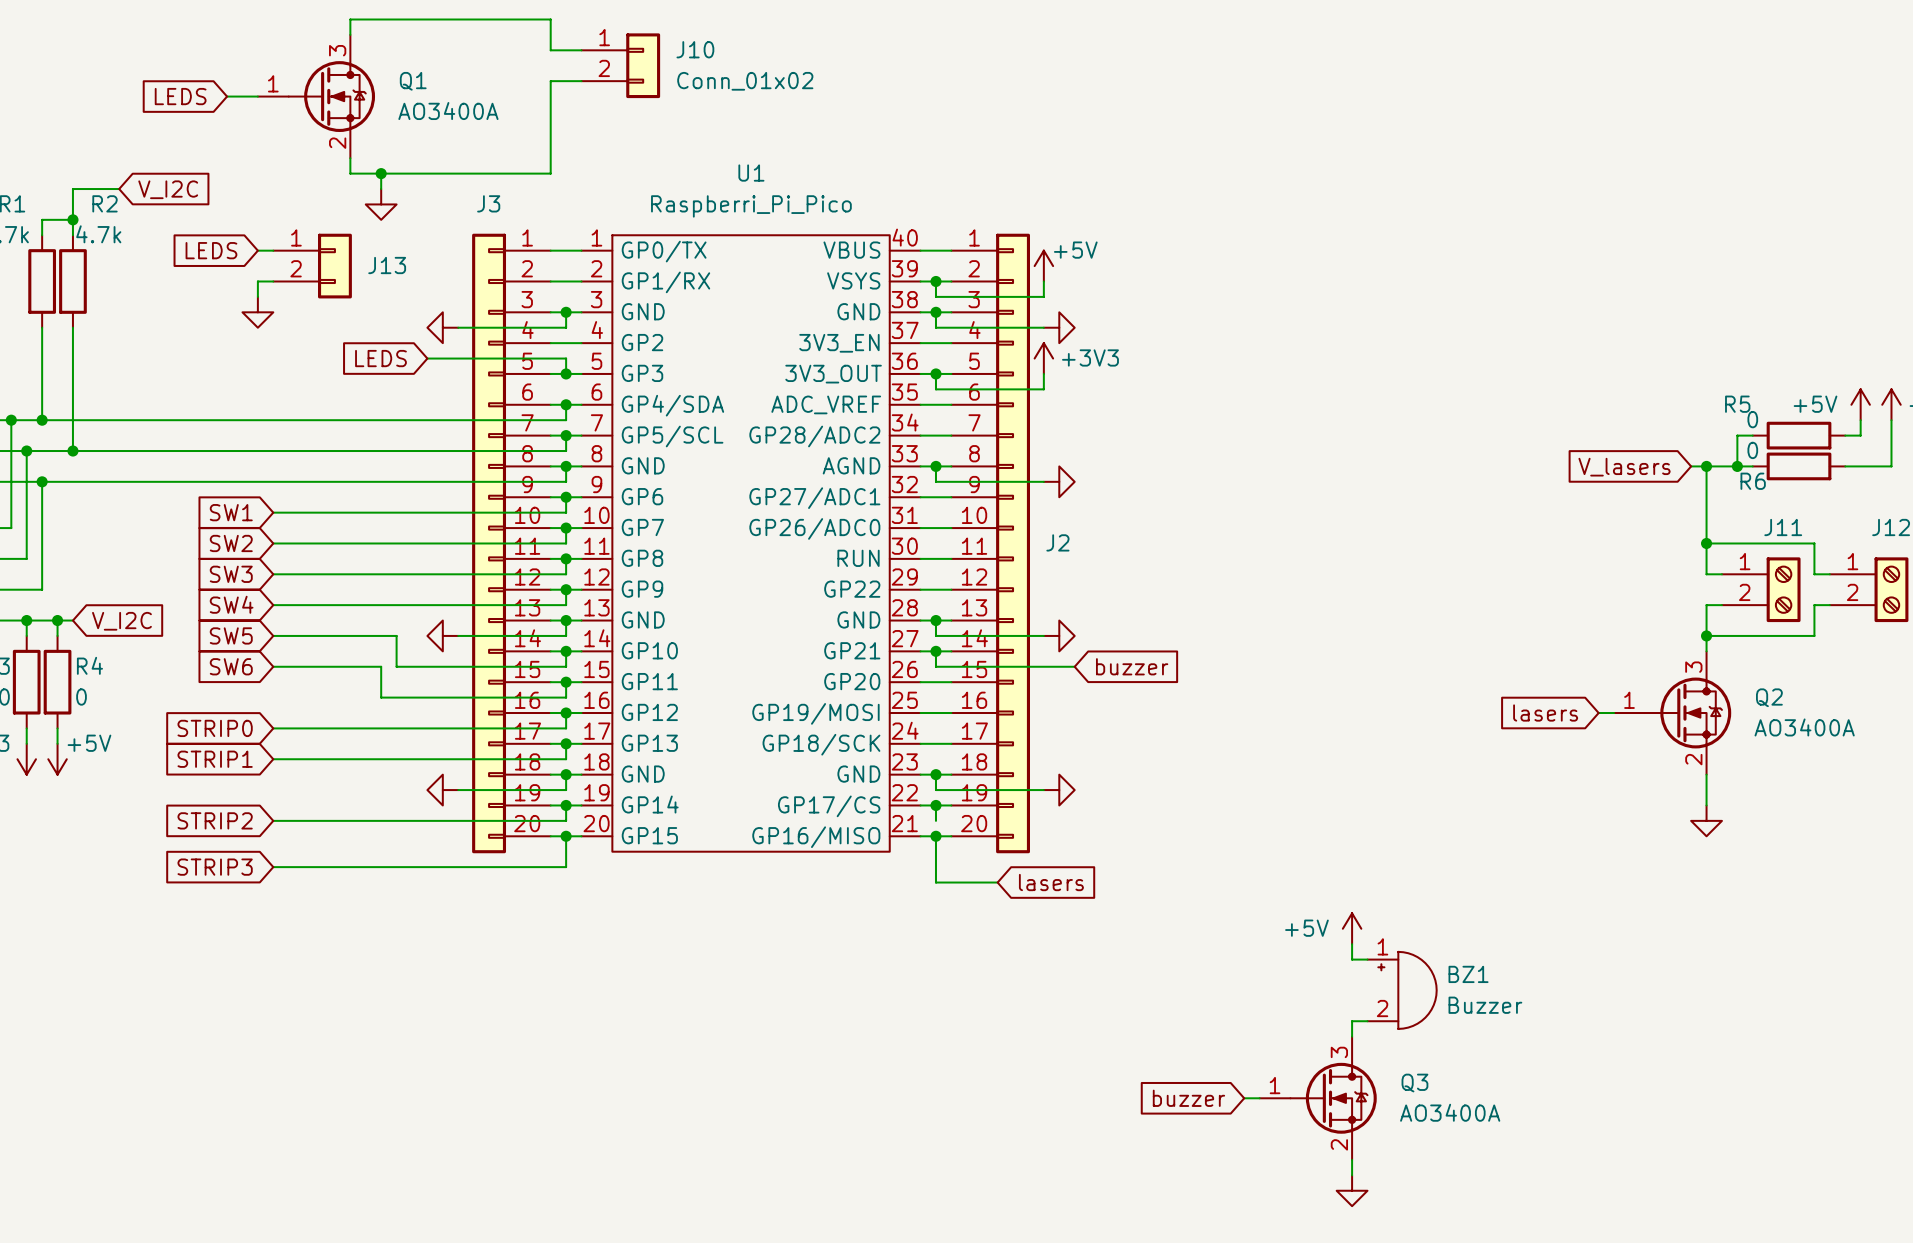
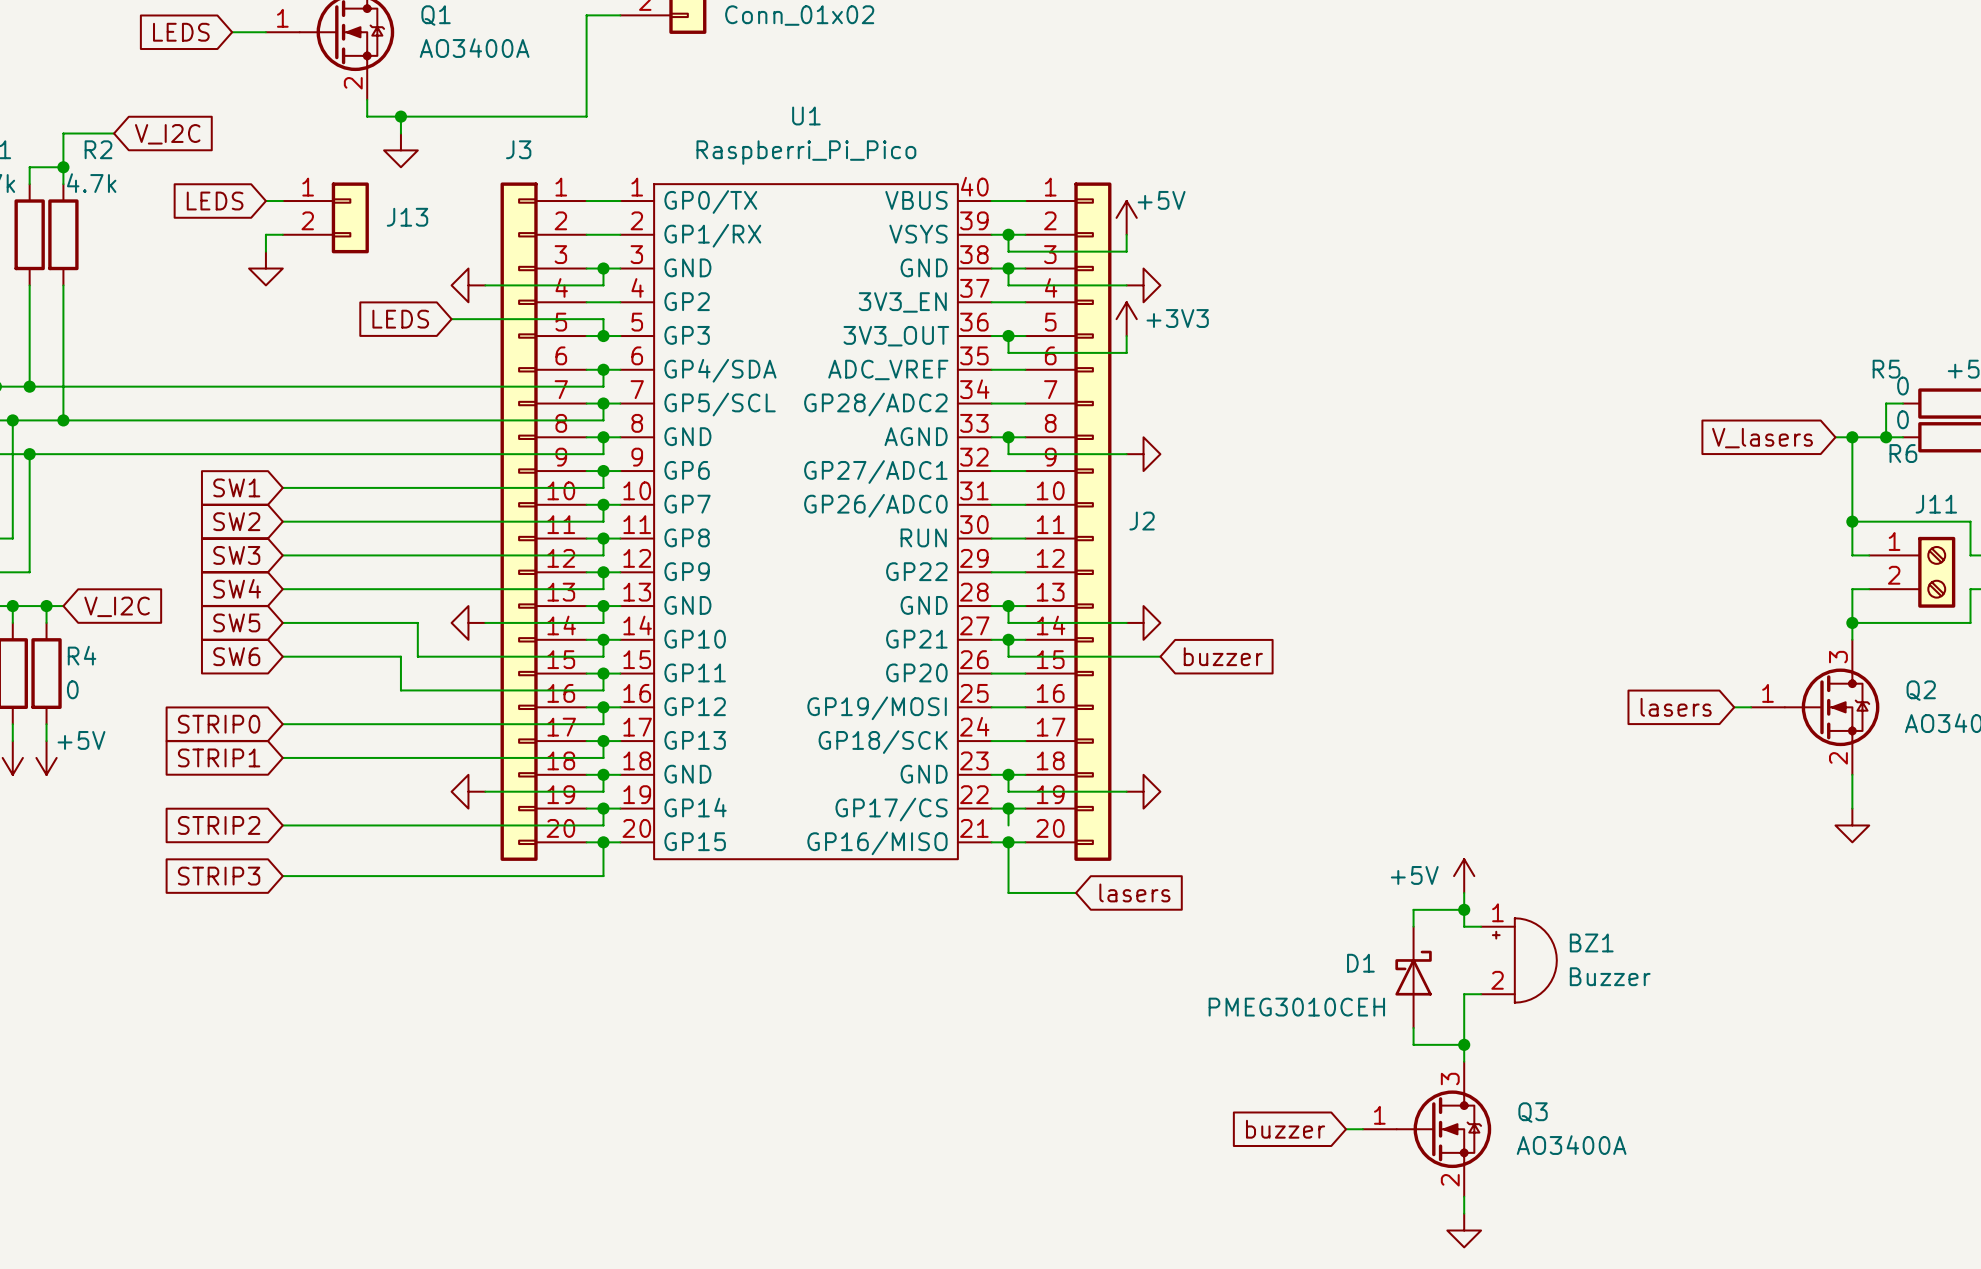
wire: none -> (1464, 892) (1464, 926) (1481, 926)
wire: none -> (1464, 909) (1413, 909) (1413, 926)
junction: none -> (1464, 909)
power symbol position: +5V (1352, 928) -> +5V (1464, 876)
wire: (1352, 944) (1352, 959) (1367, 959) -> none
D1: none -> PMEG3010CEH (1413, 977)
wire: none -> (1481, 994) (1464, 994) (1464, 1044) (1413, 1044) (1413, 1027)
BZ1 position: (1402, 990) -> (1518, 960)
wire: (1352, 1021) (1367, 1021) -> none
junction: none -> (1464, 1044)

